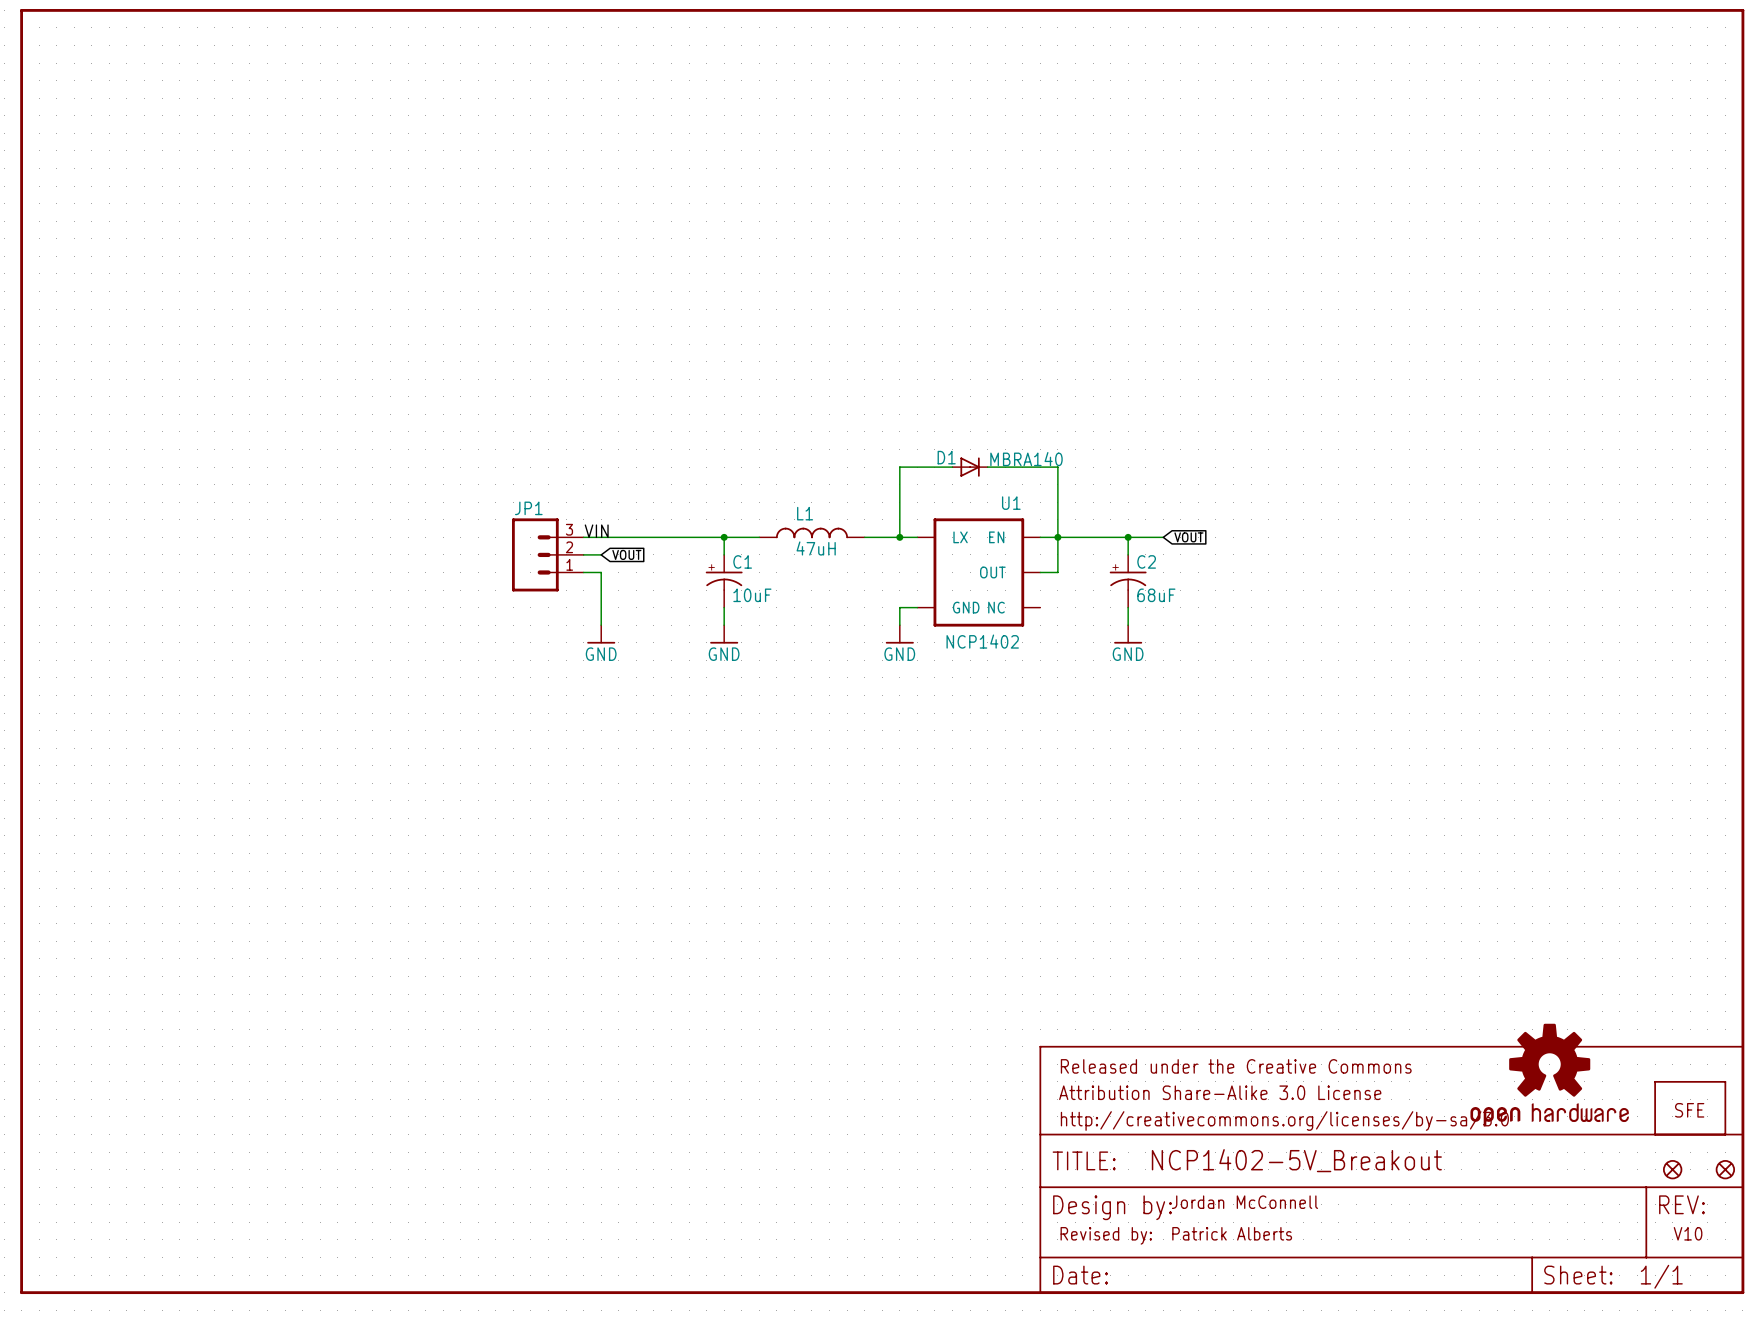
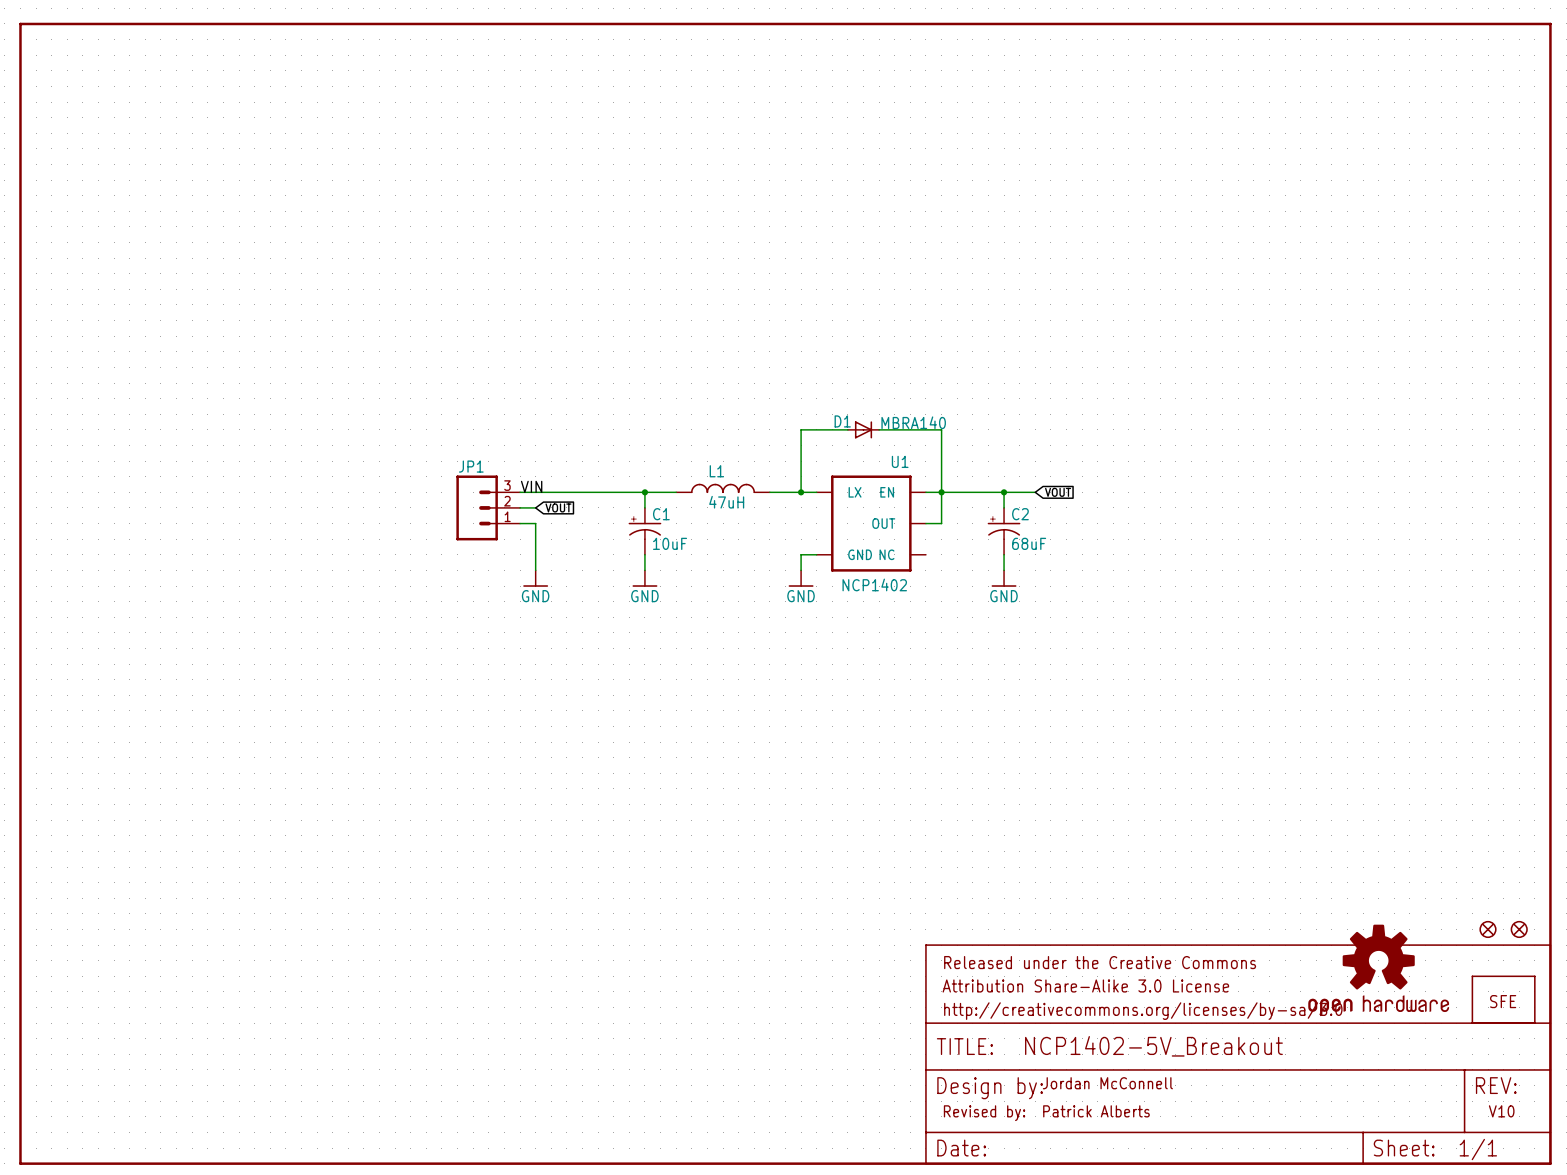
part: none -> (1488, 929)
part: none -> (1519, 929)
part: (1672, 1169) -> none
part: (1725, 1169) -> none

